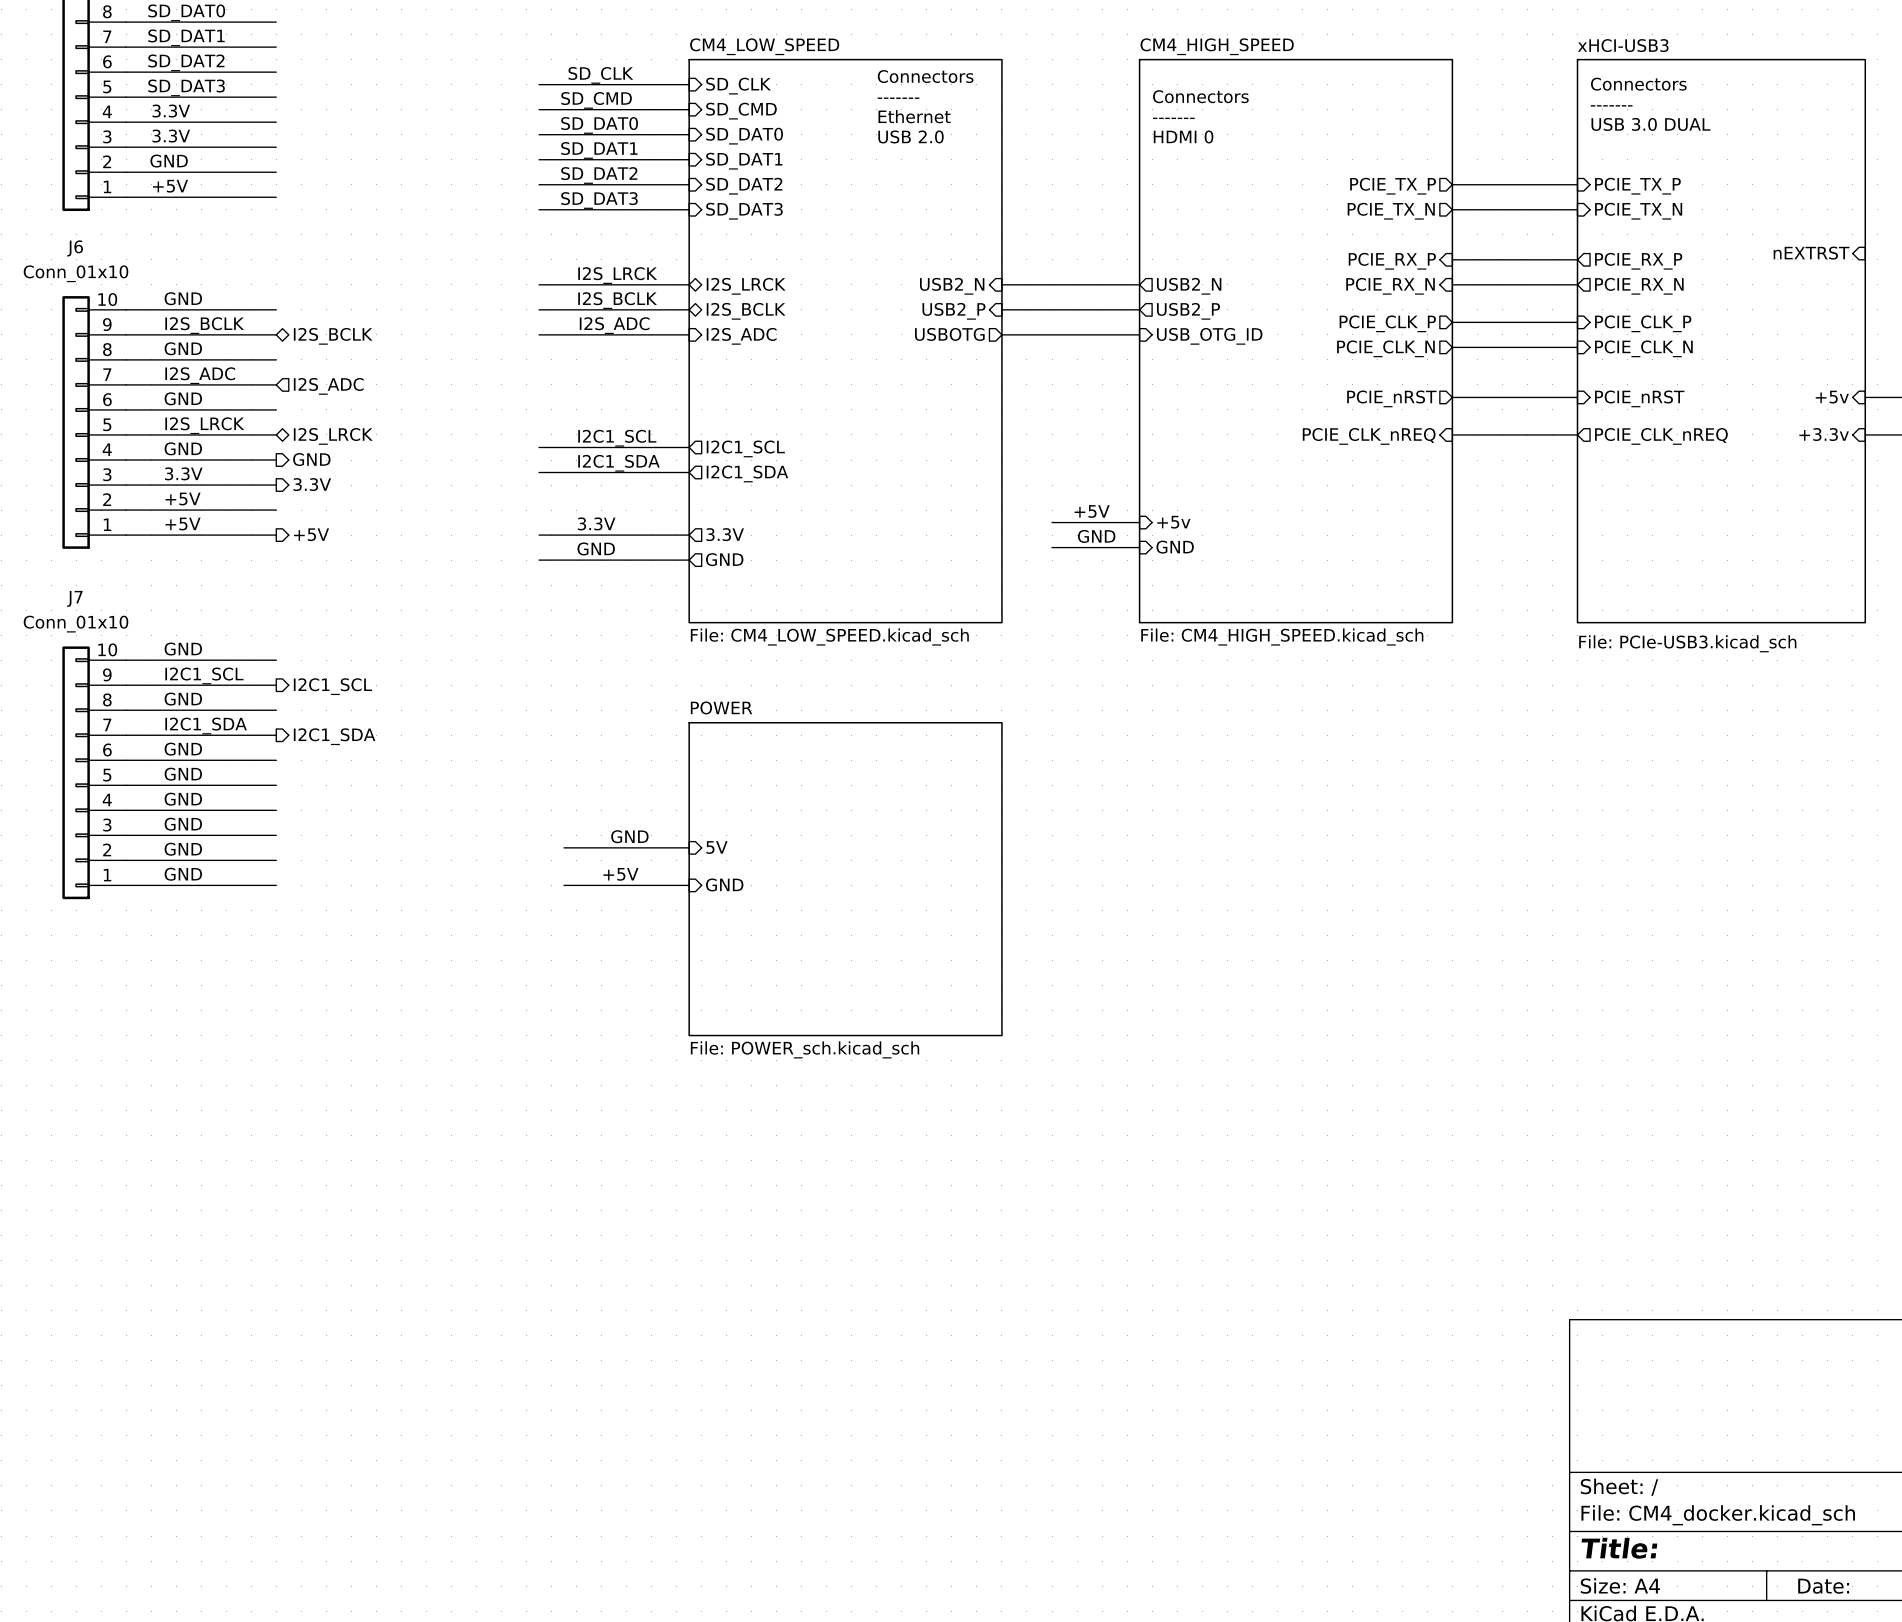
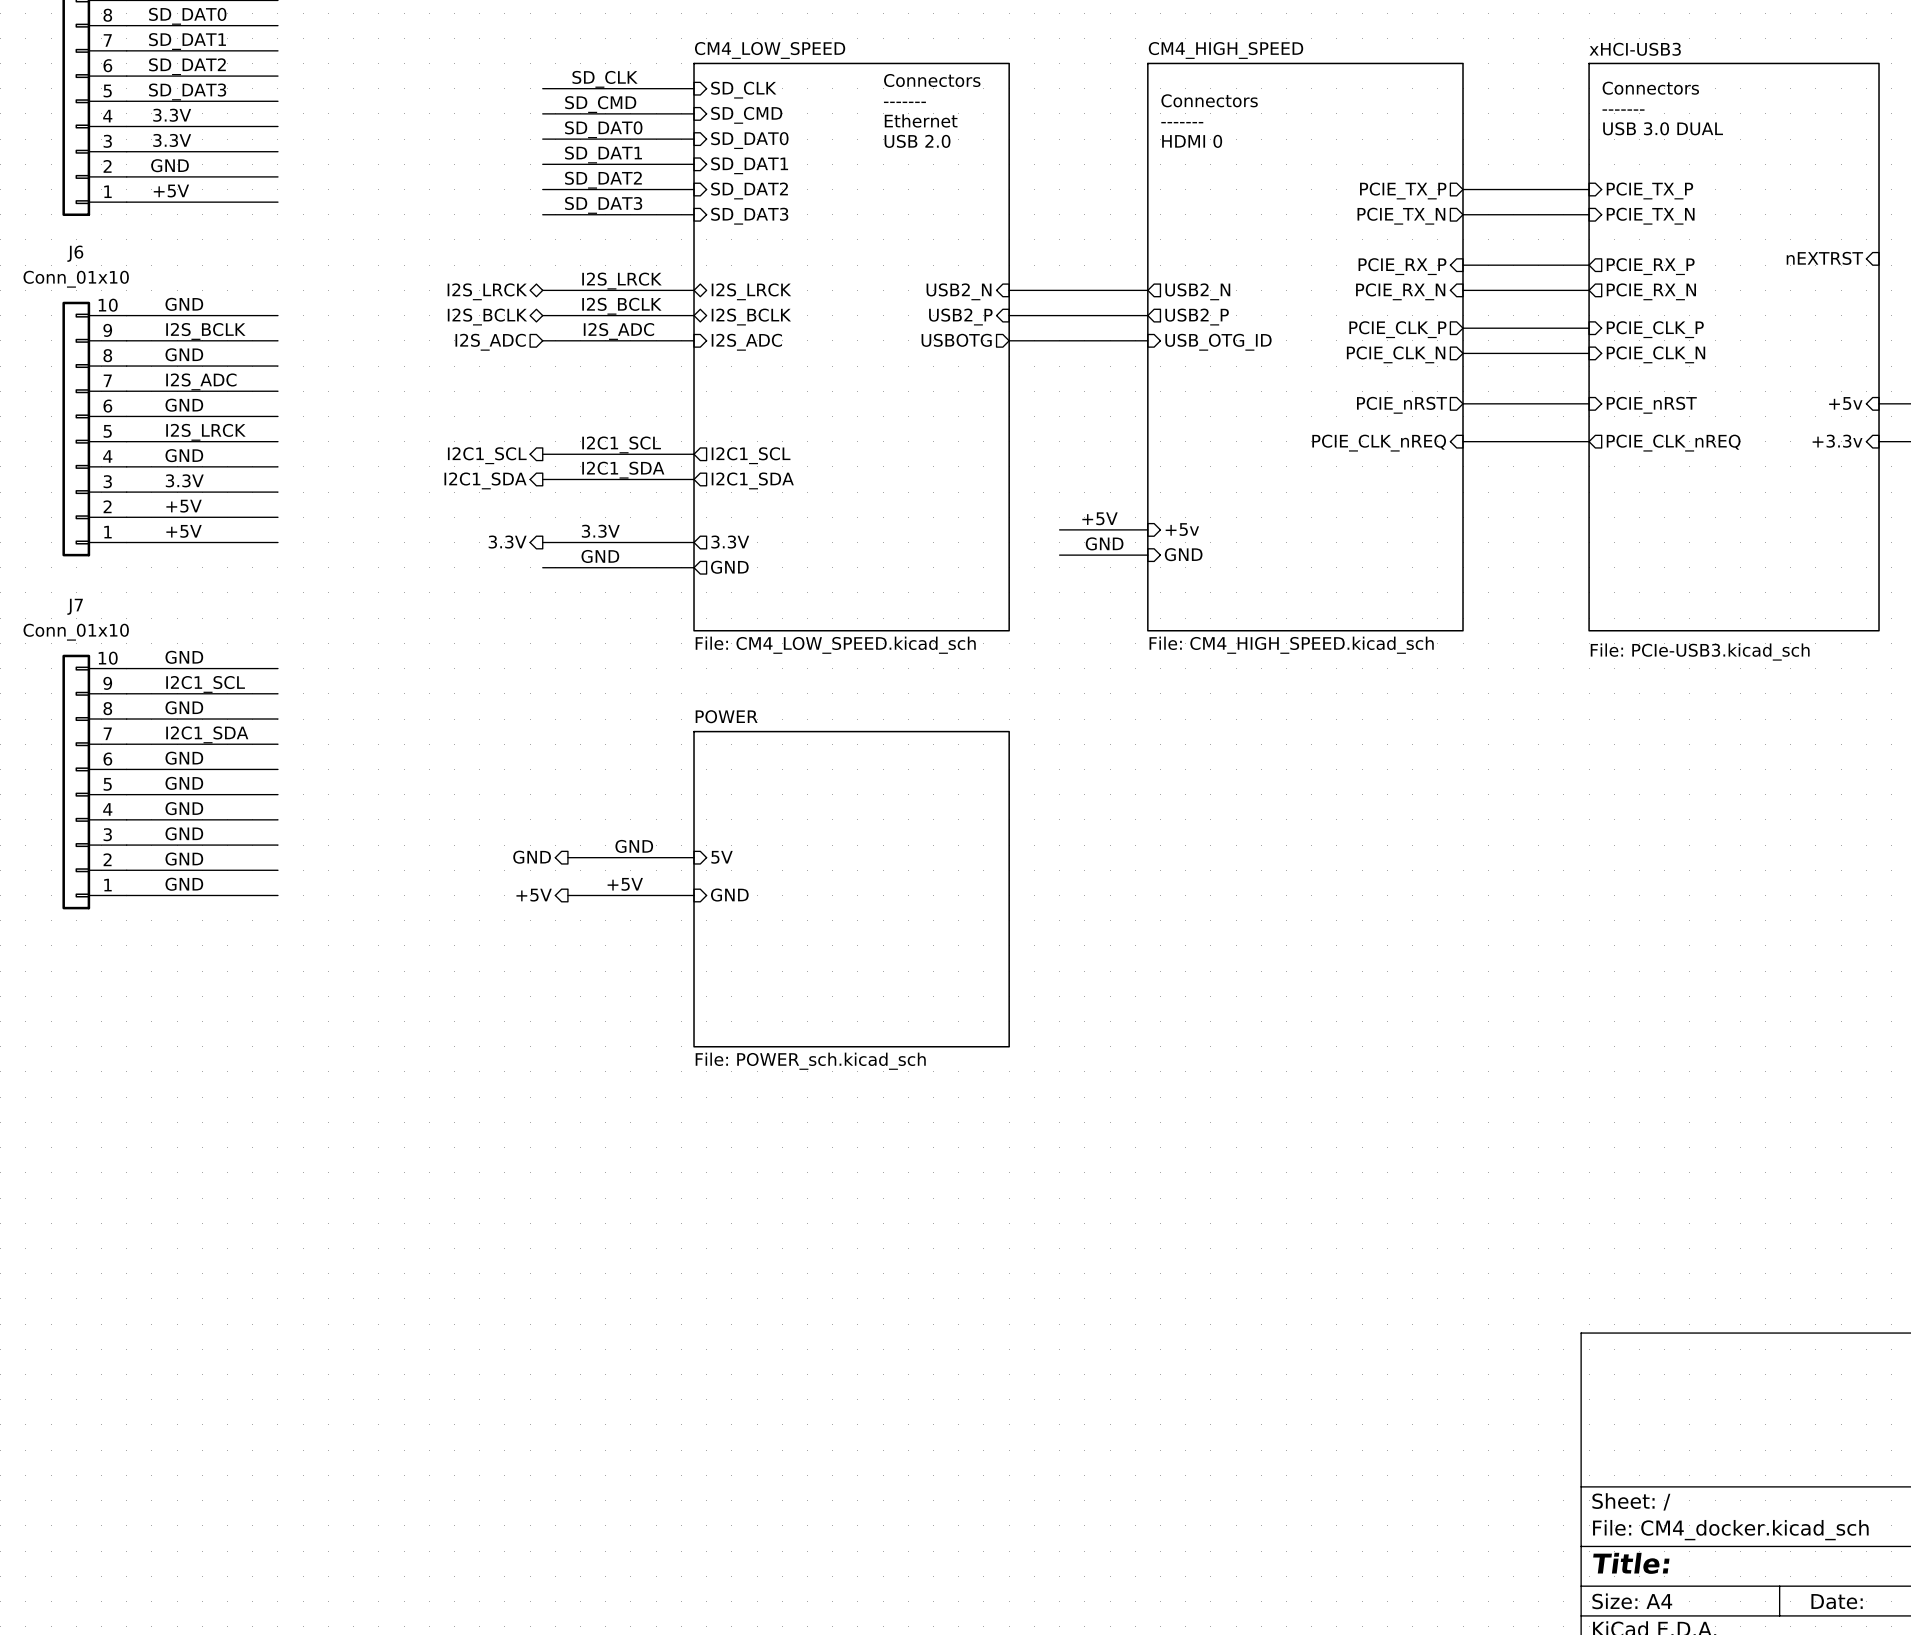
hierarchical label: none -> I2S_LRCK (487, 291)
hierarchical label rotation: 0° (333, 336) -> 180° (487, 317)
hierarchical label position: I2S_BCLK (333, 336) -> I2S_BCLK (487, 317)
hierarchical label rotation: 0° (328, 386) -> 180° (490, 342)
hierarchical label position: I2S_ADC (328, 386) -> I2S_ADC (490, 342)
hierarchical label: I2S_LRCK (333, 436) -> none
hierarchical label: none -> I2C1_SCL (487, 455)
hierarchical label: GND (311, 459) -> none
hierarchical label: none -> I2C1_SDA (485, 480)
hierarchical label rotation: 0° (312, 484) -> 180° (507, 542)
hierarchical label position: 3.3V (312, 484) -> 3.3V (507, 542)
hierarchical label: +5V (311, 534) -> none
hierarchical label: I2C1_SCL (332, 686) -> none
hierarchical label: I2C1_SDA (334, 736) -> none
hierarchical label: none -> GND (532, 857)
hierarchical label: none -> +5V (534, 895)

